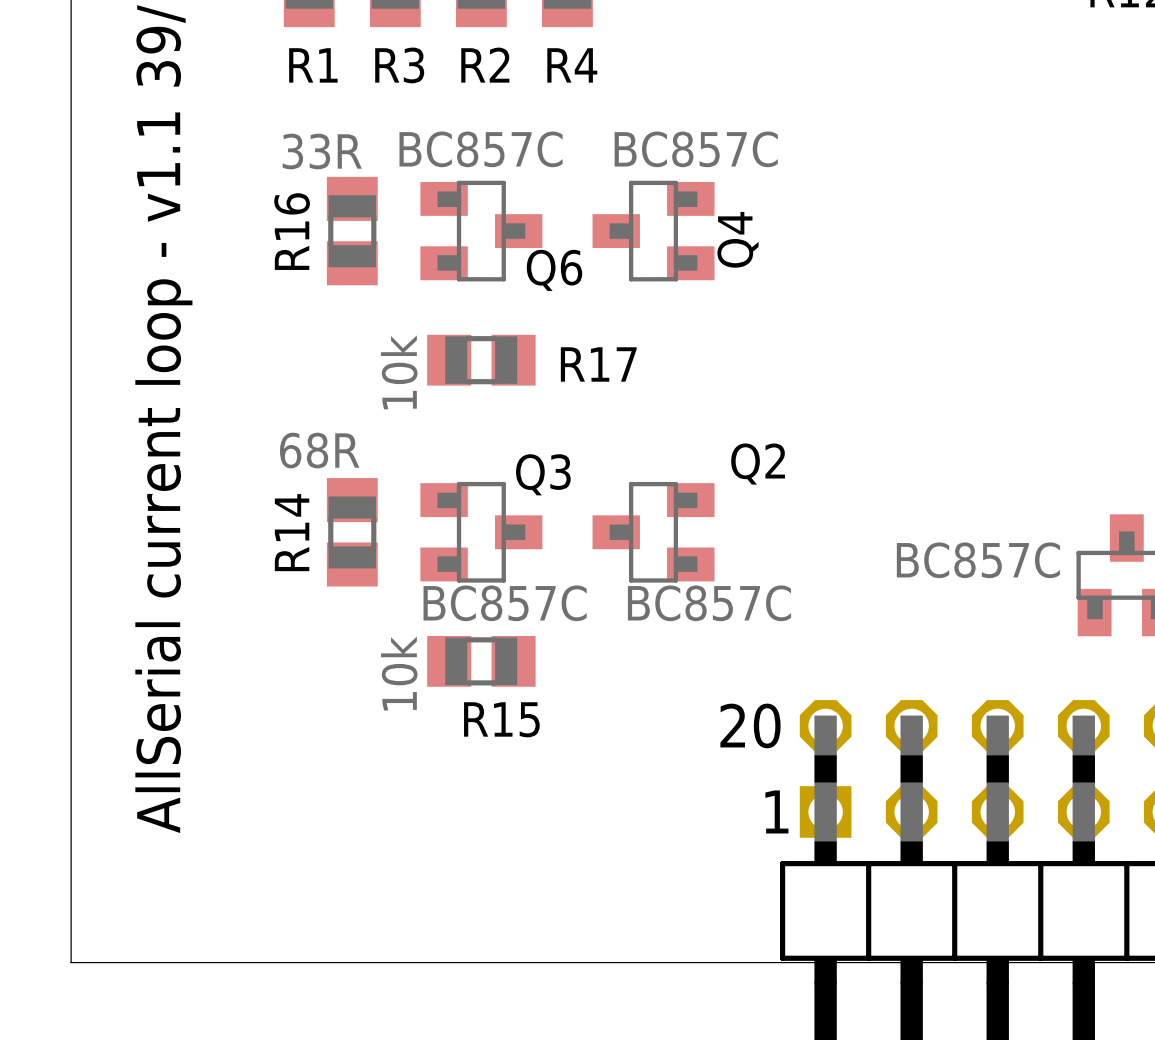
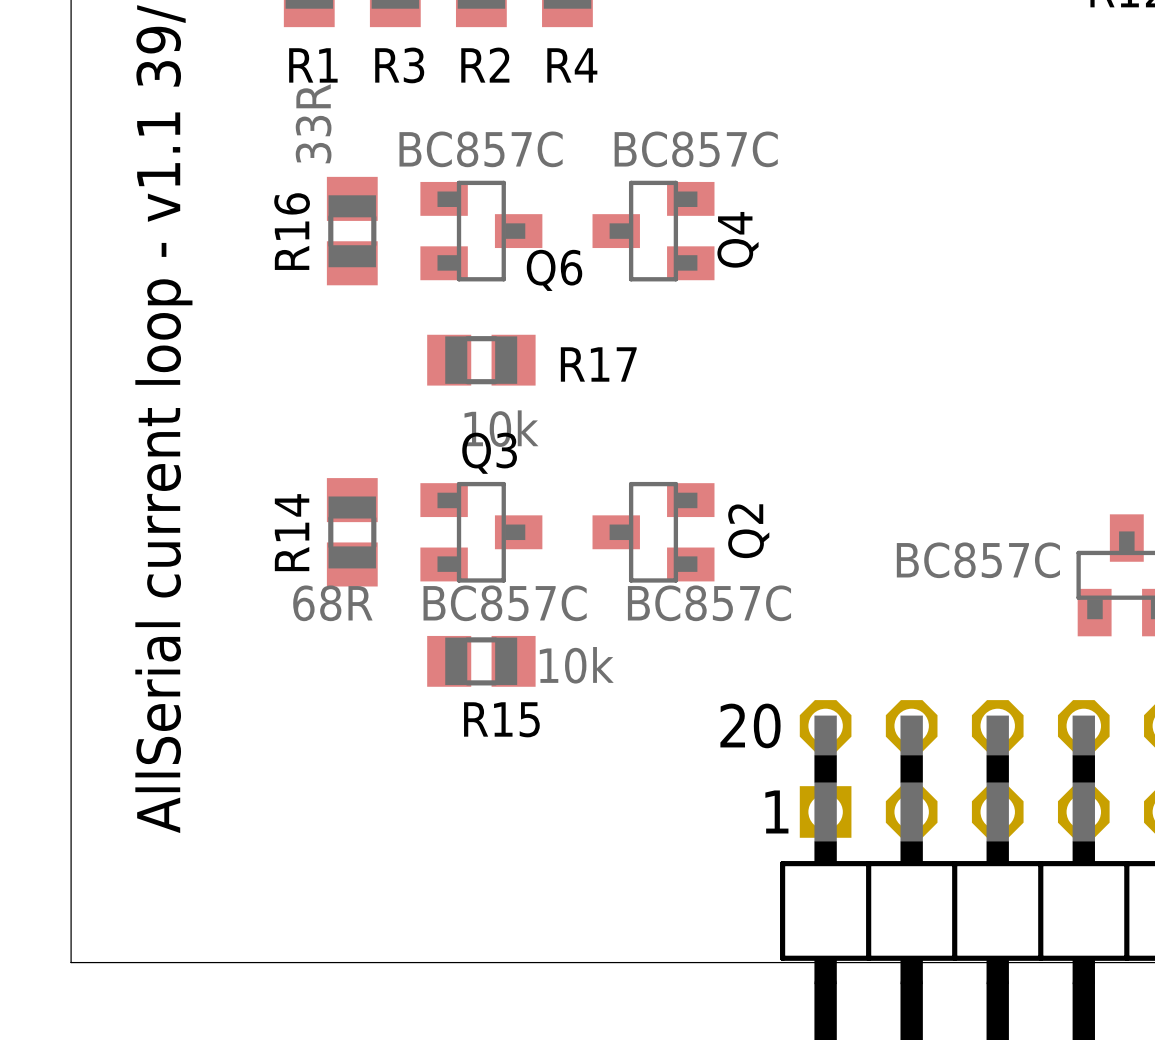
R16 value rotation: 0° (322, 151) -> 90° counterclockwise (313, 123)
R17 value rotation: 0° (399, 372) -> 90° clockwise (501, 428)
R17 value position: 10k (399, 372) -> 10k (501, 428)
R14 value position: 68R (319, 450) -> 68R (332, 603)
Q2 name rotation: 0° (758, 464) -> 90° counterclockwise (748, 531)
Q3 name position: Q3 (543, 474) -> Q3 (489, 453)
R15 value rotation: 0° (399, 673) -> 90° clockwise (576, 665)
R15 value position: 10k (399, 673) -> 10k (576, 665)

